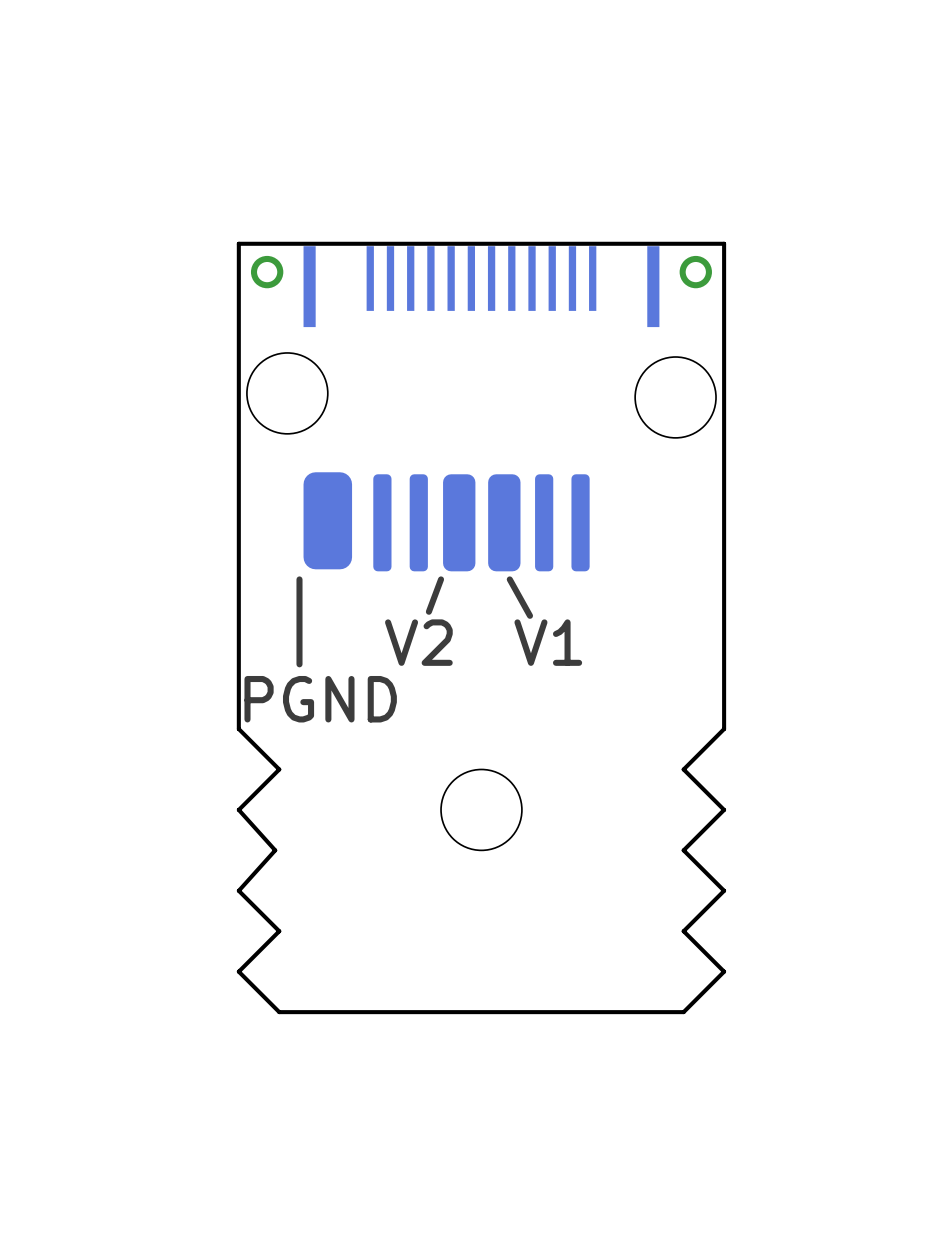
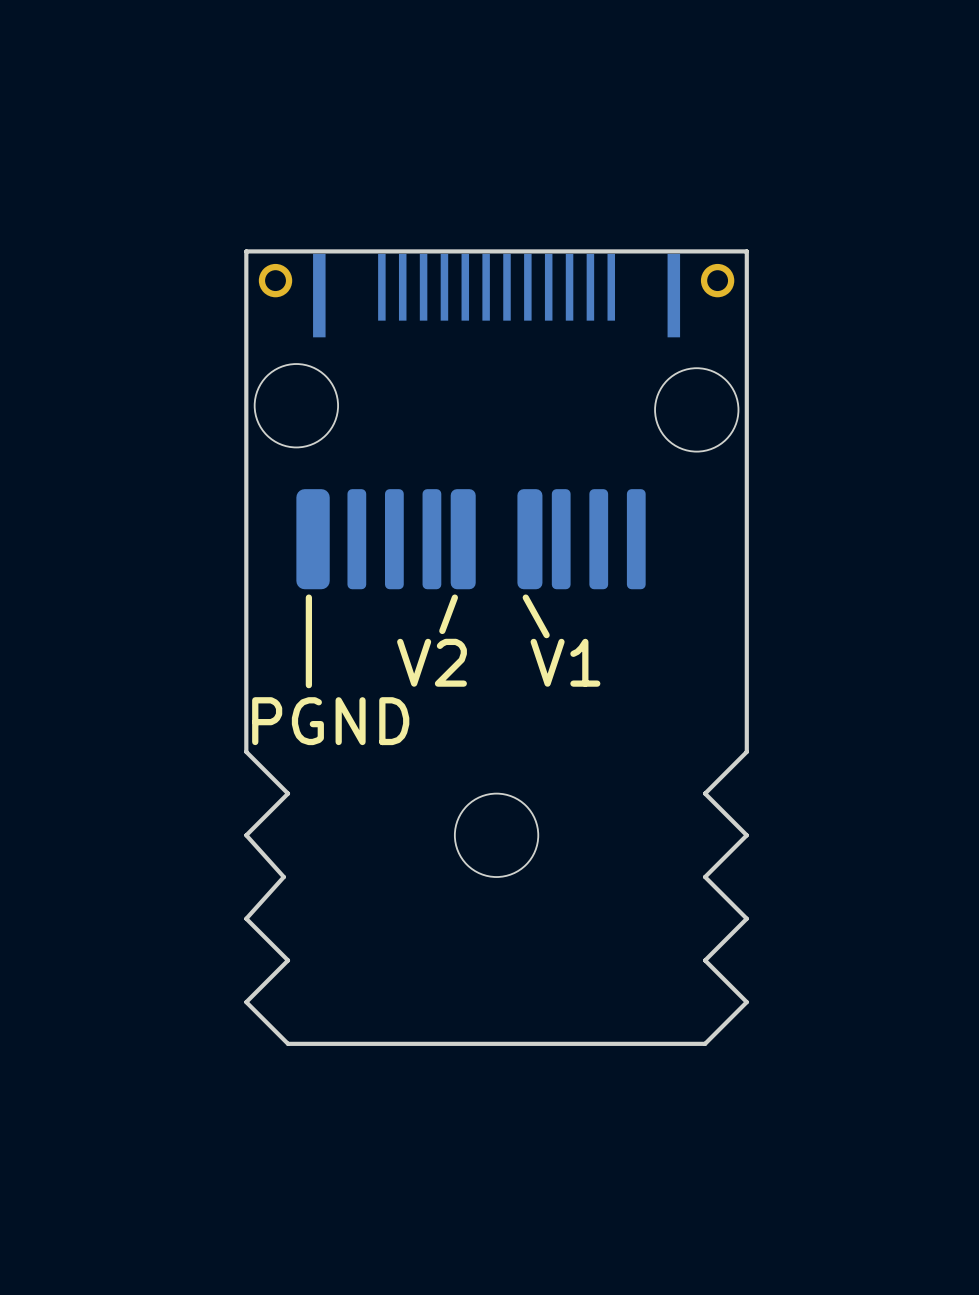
part footprint: [443, 474, 476, 572] -> [450, 489, 476, 590]
part footprint: [488, 474, 521, 572] -> [517, 489, 543, 590]
part: (327, 520) -> none
part: none -> (313, 539)
part: none -> (356, 539)
part: none -> (636, 539)

